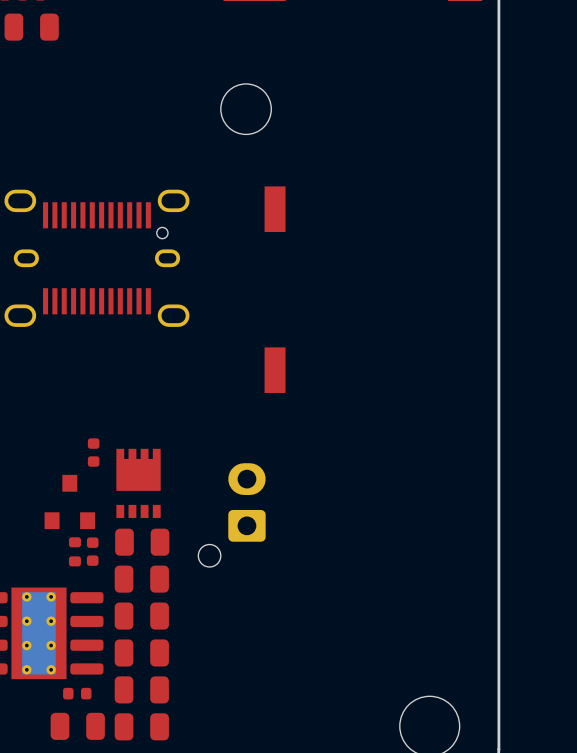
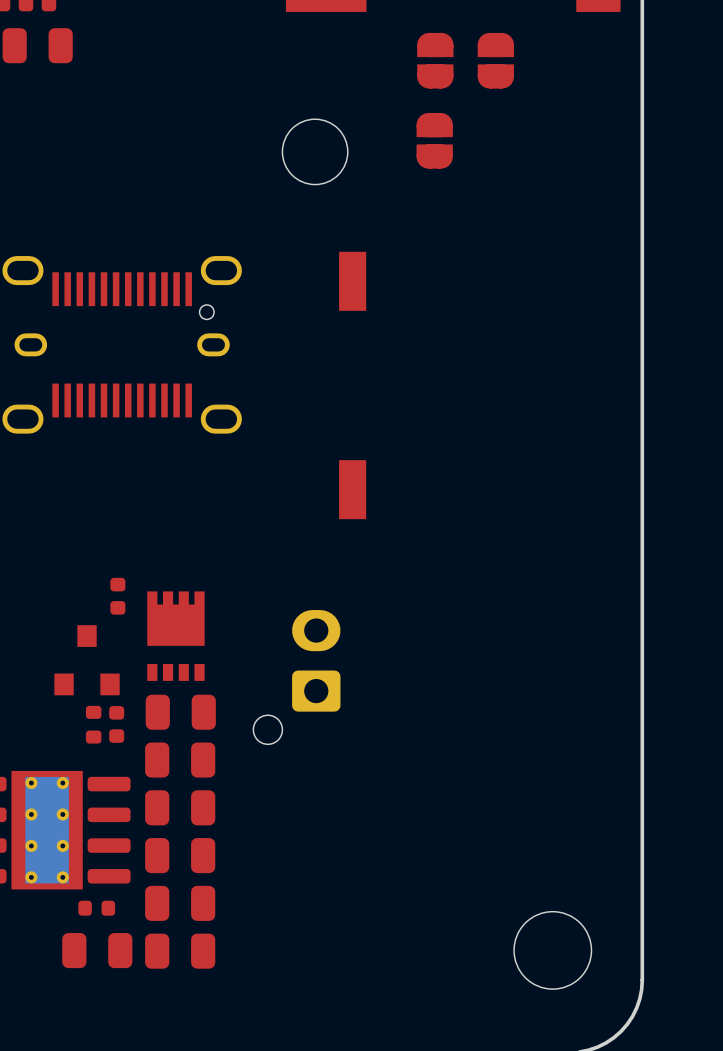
part: none -> (435, 60)
part: none -> (495, 60)
part: none -> (434, 140)

